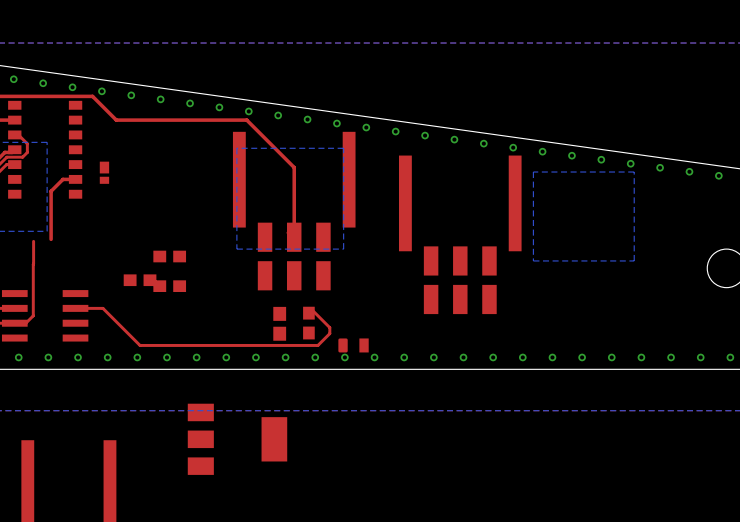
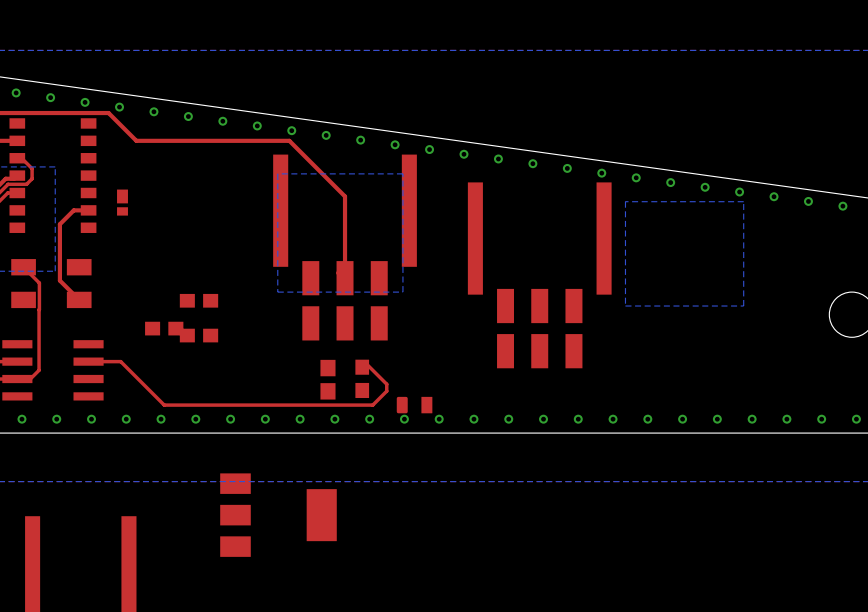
top track: none -> (23, 267) (39, 283)
top track: none -> (59, 280) (79, 299)
part: none -> (51, 283)

